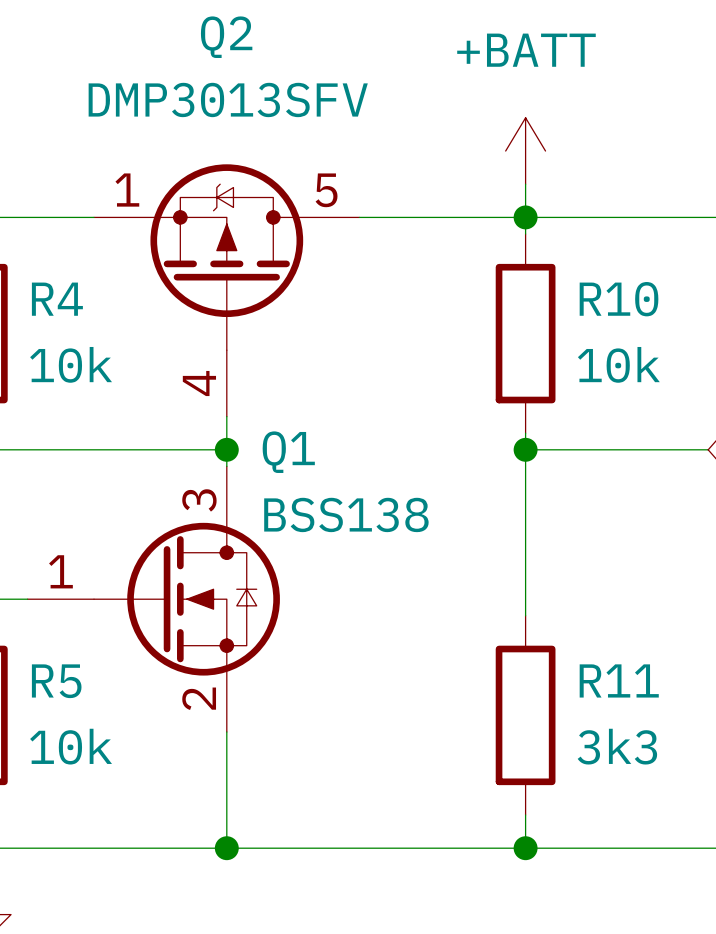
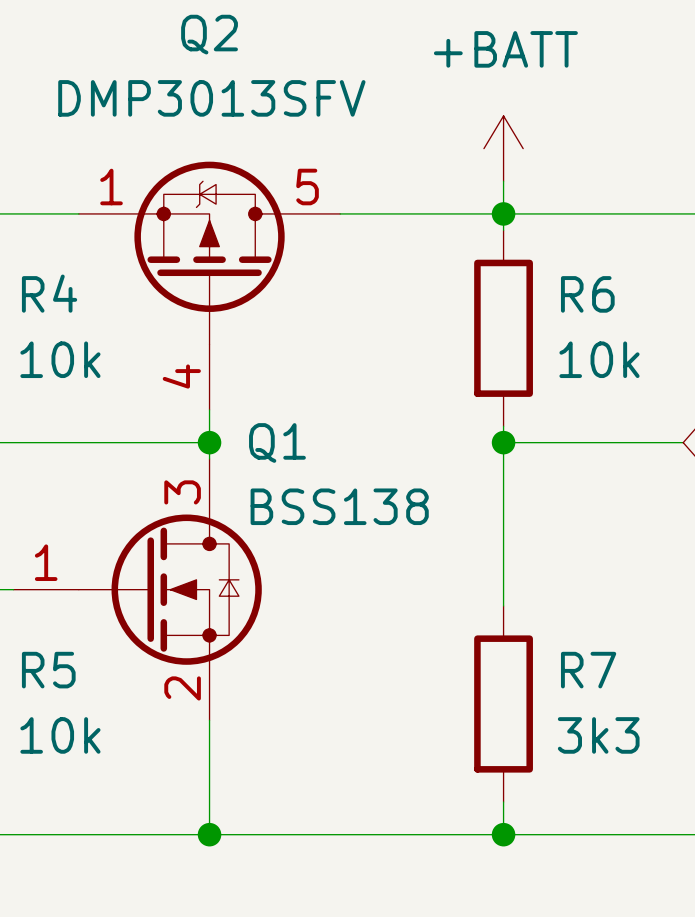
R10 name: R10 (619, 299) -> R6 (587, 294)
R11 name: R11 (619, 680) -> R7 (588, 670)

